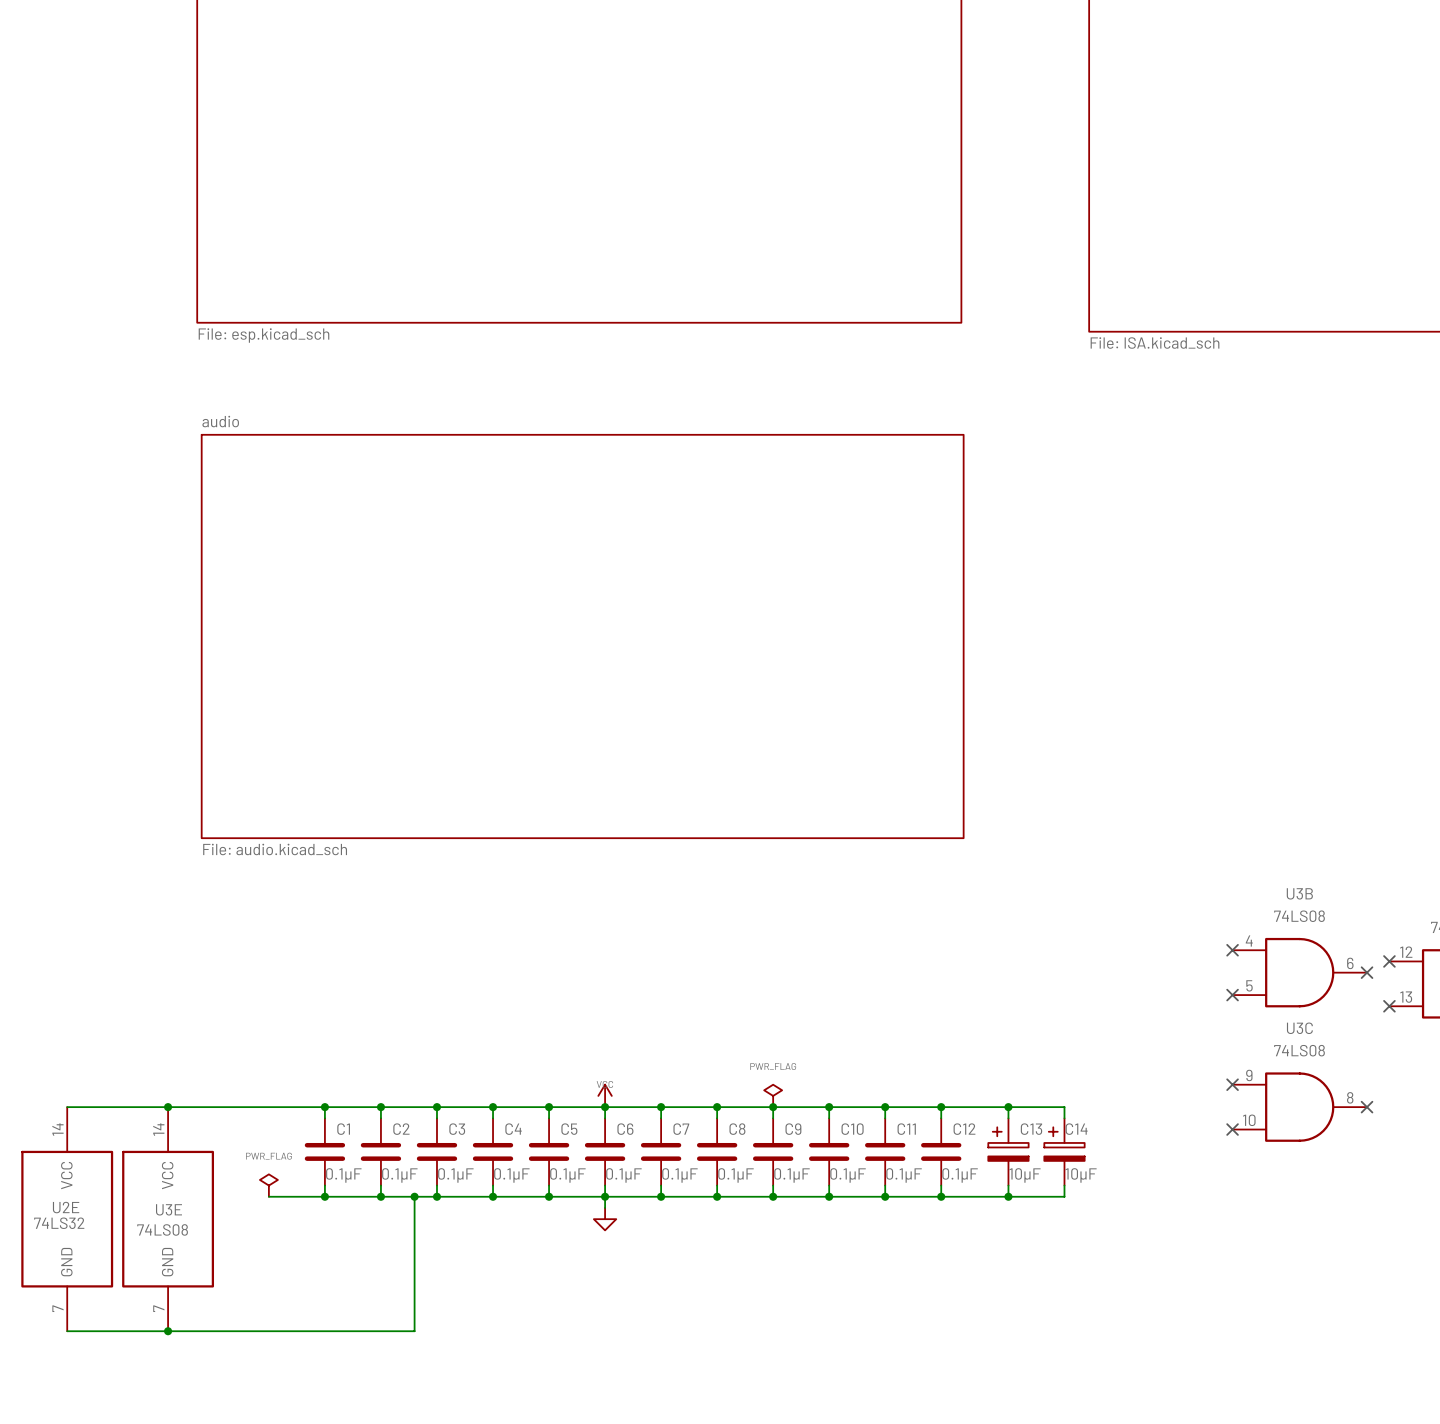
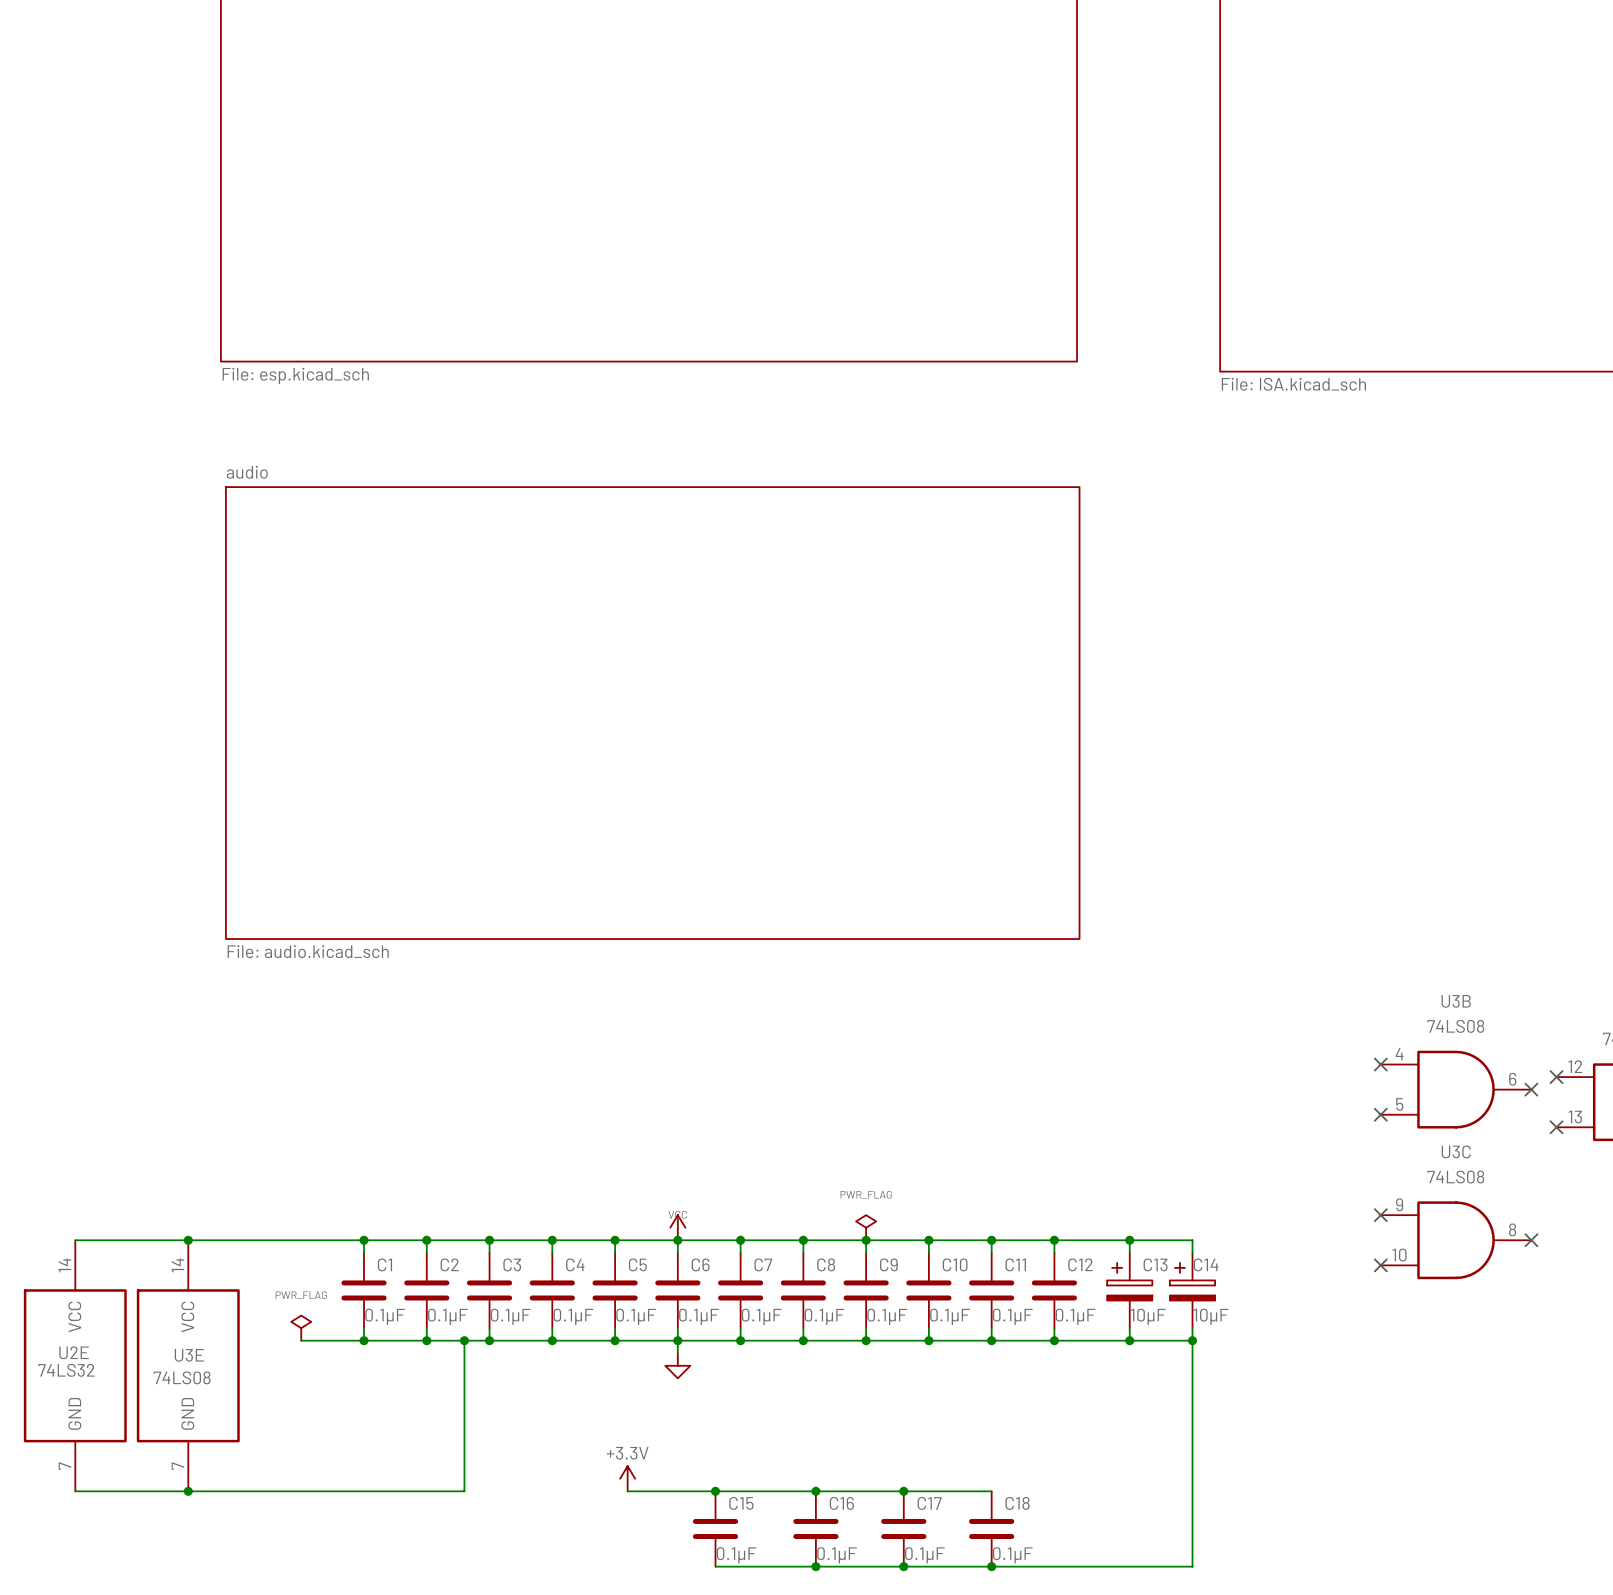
wire: none -> (1192, 1340) (1192, 1566) (715, 1566)
junction: none -> (1192, 1340)
power symbol: none -> +3.3V (627, 1478)
wire: none -> (627, 1491) (991, 1491)
junction: none -> (715, 1491)
junction: none -> (815, 1491)
junction: none -> (903, 1491)
C15: none -> 0.1µF (715, 1528)
C16: none -> 0.1µF (815, 1528)
C17: none -> 0.1µF (903, 1528)
C18: none -> 0.1µF (991, 1528)
junction: none -> (815, 1566)
junction: none -> (903, 1566)
junction: none -> (991, 1566)

